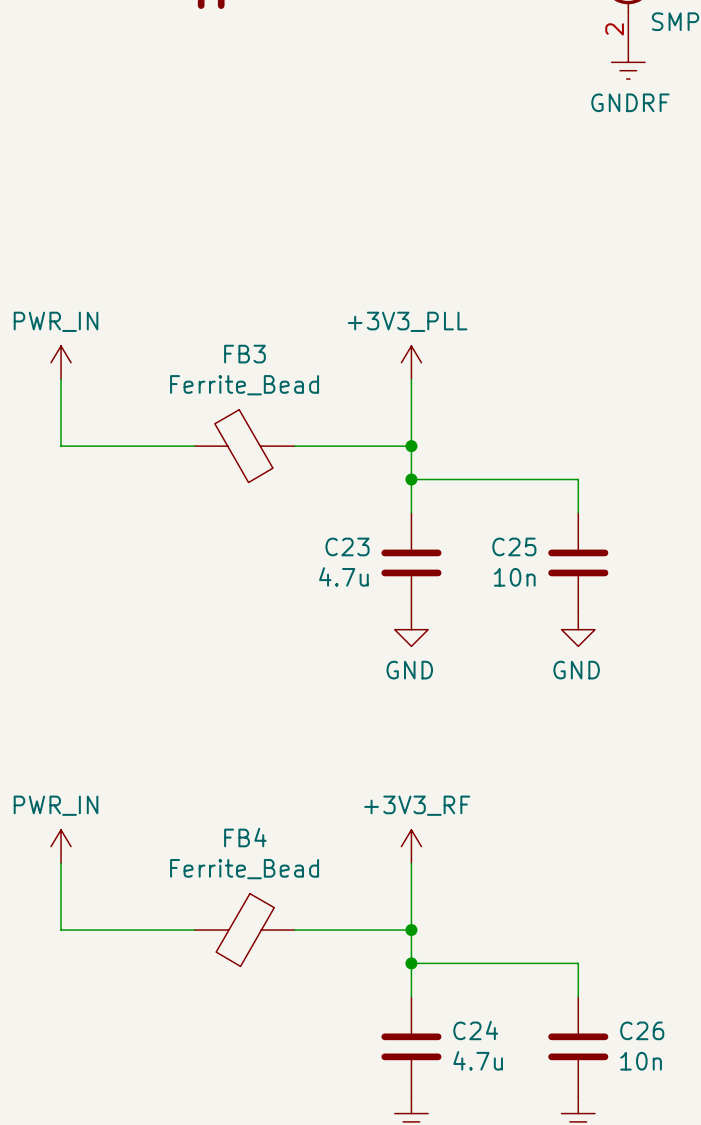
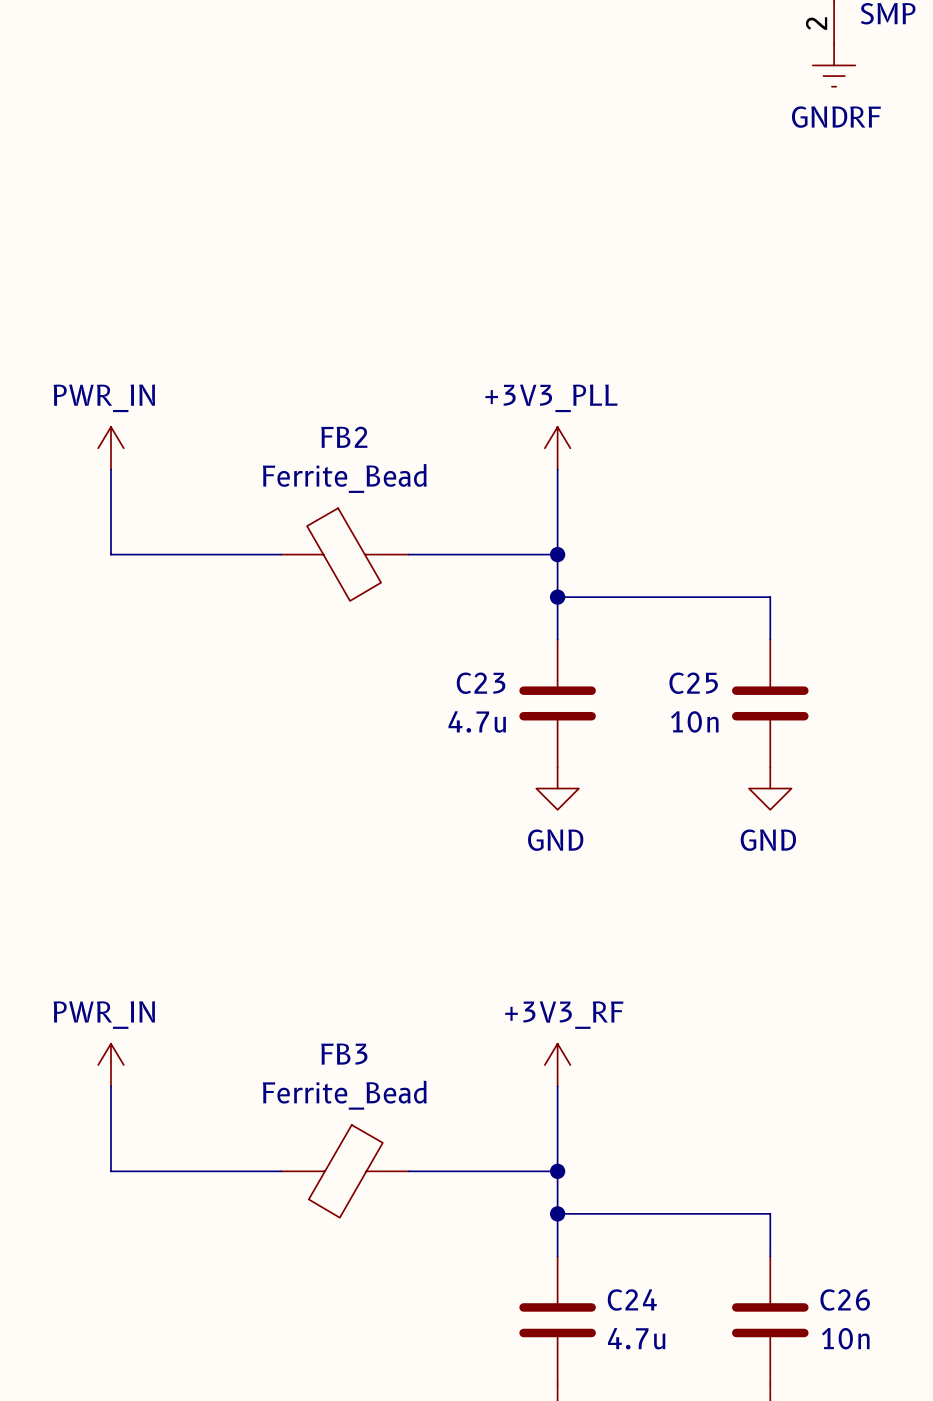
FB3 name: FB3 (244, 354) -> FB2 (344, 437)
FB4 name: FB4 (245, 837) -> FB3 (344, 1054)

